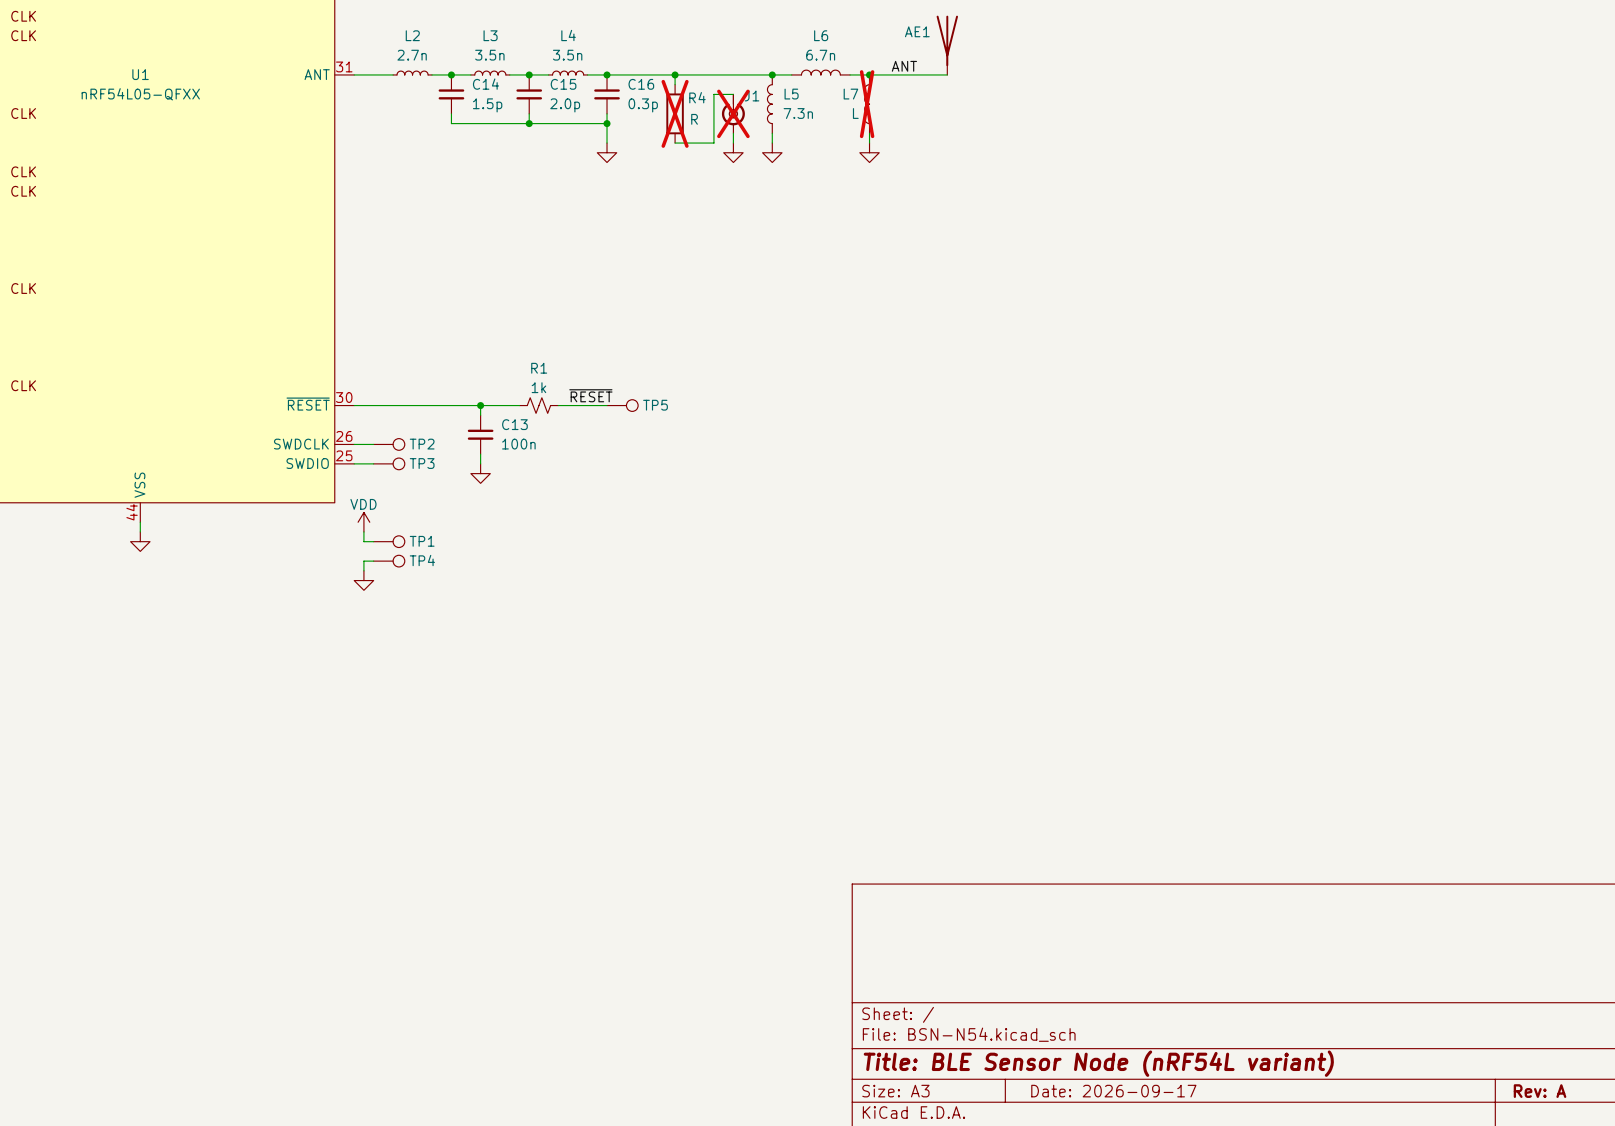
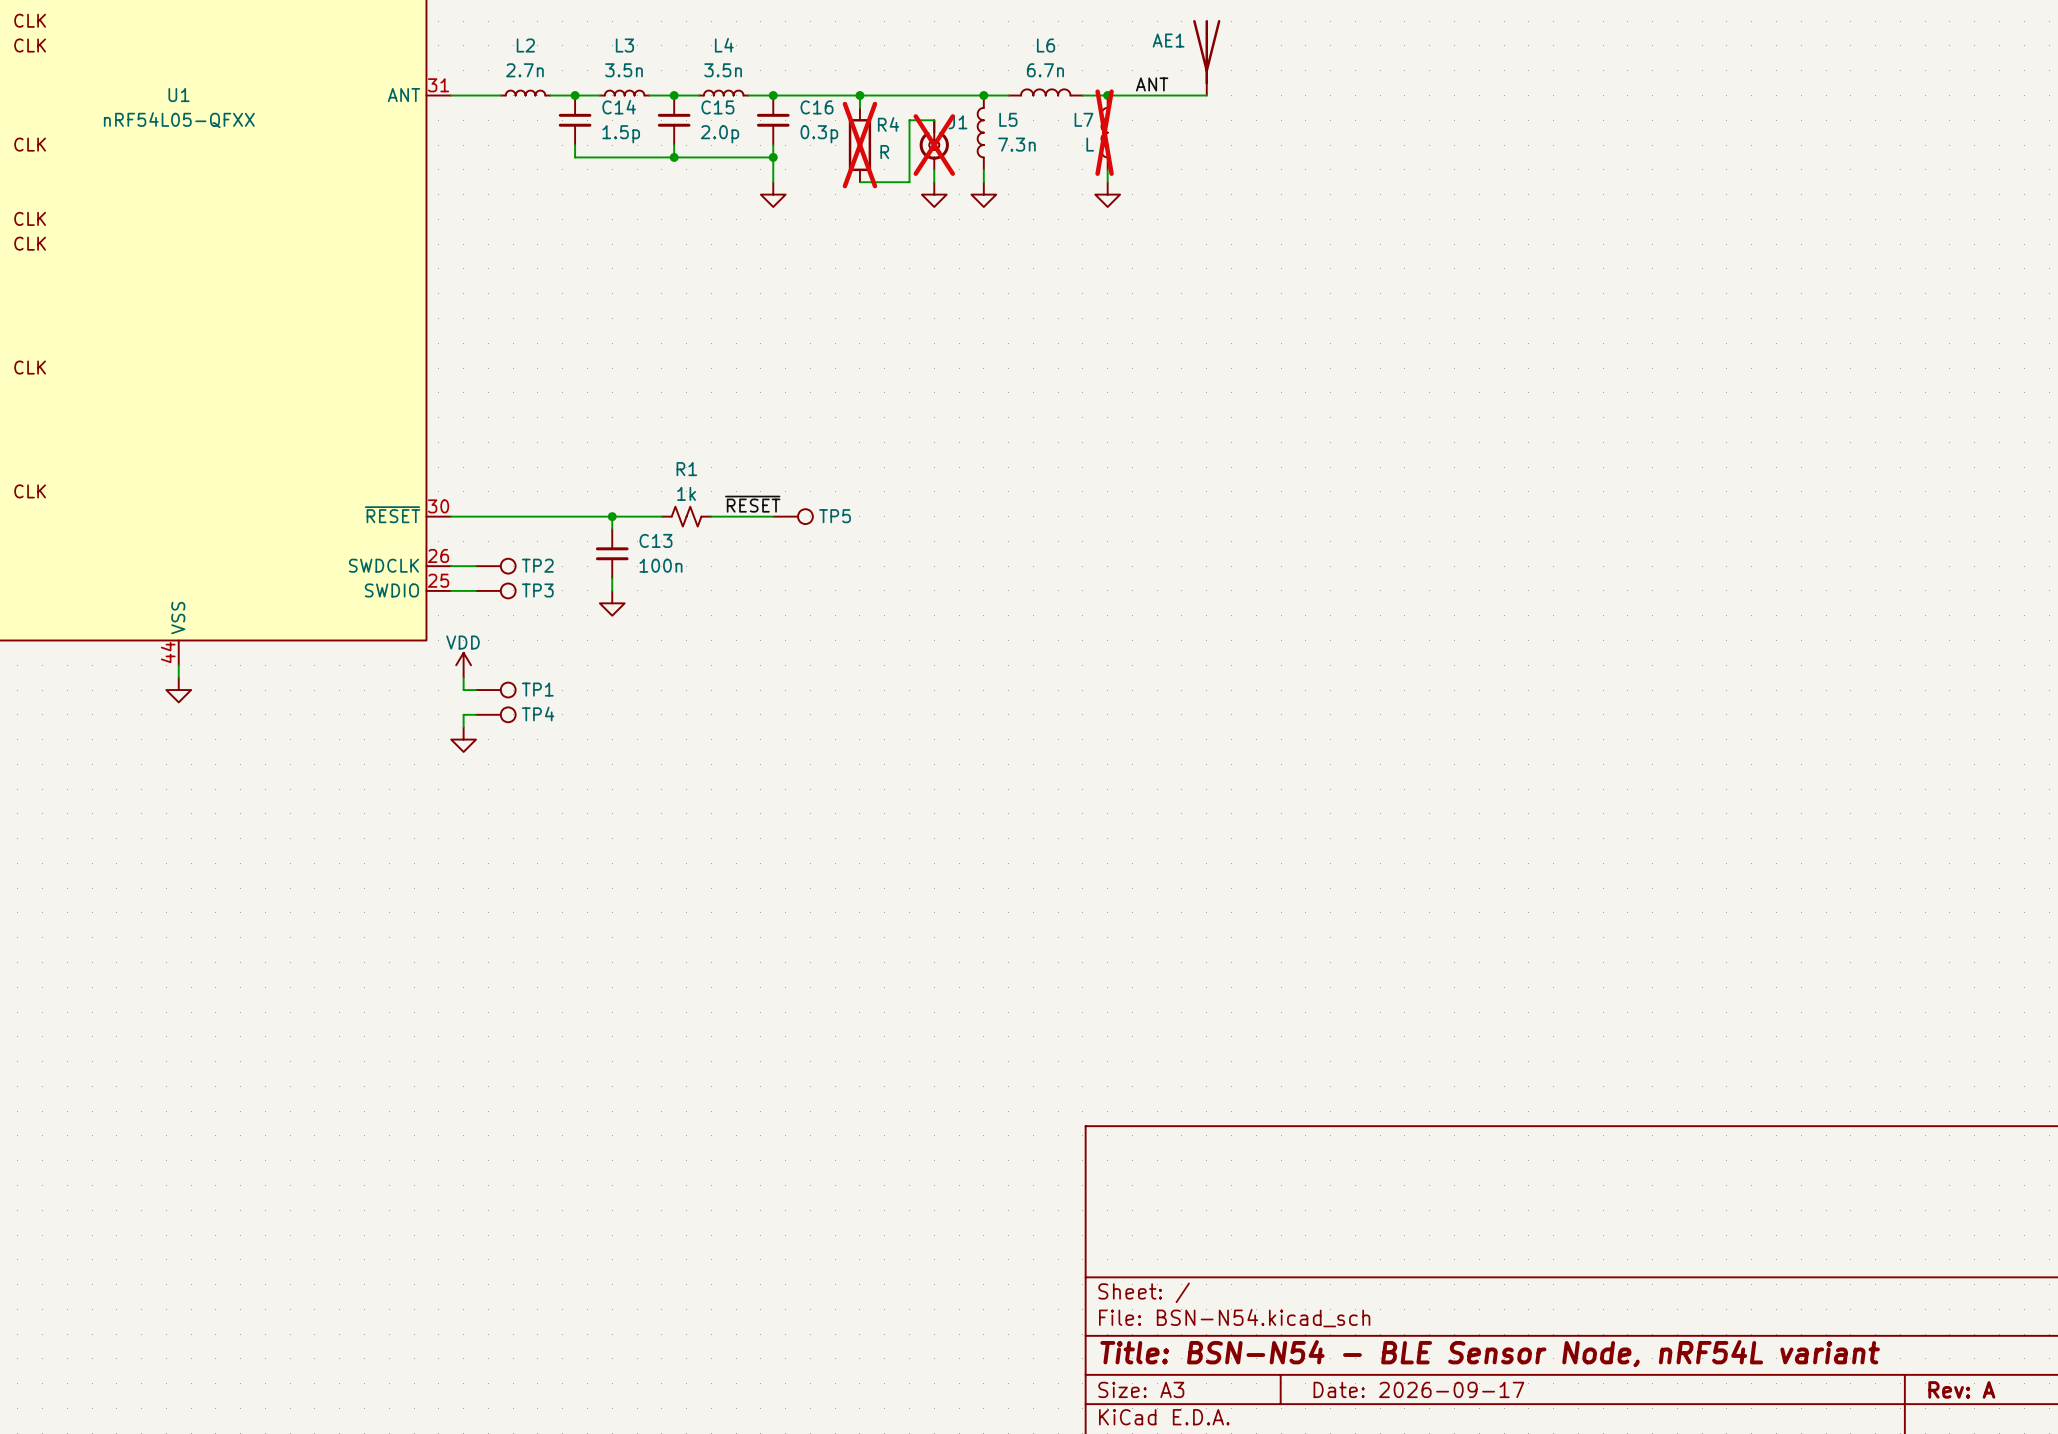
title block: Title: BLE Sensor Node (nRF54L variant) (1098, 1063) -> Title: BSN-N54 - BLE Sensor Node, nRF54L variant (1490, 1353)

